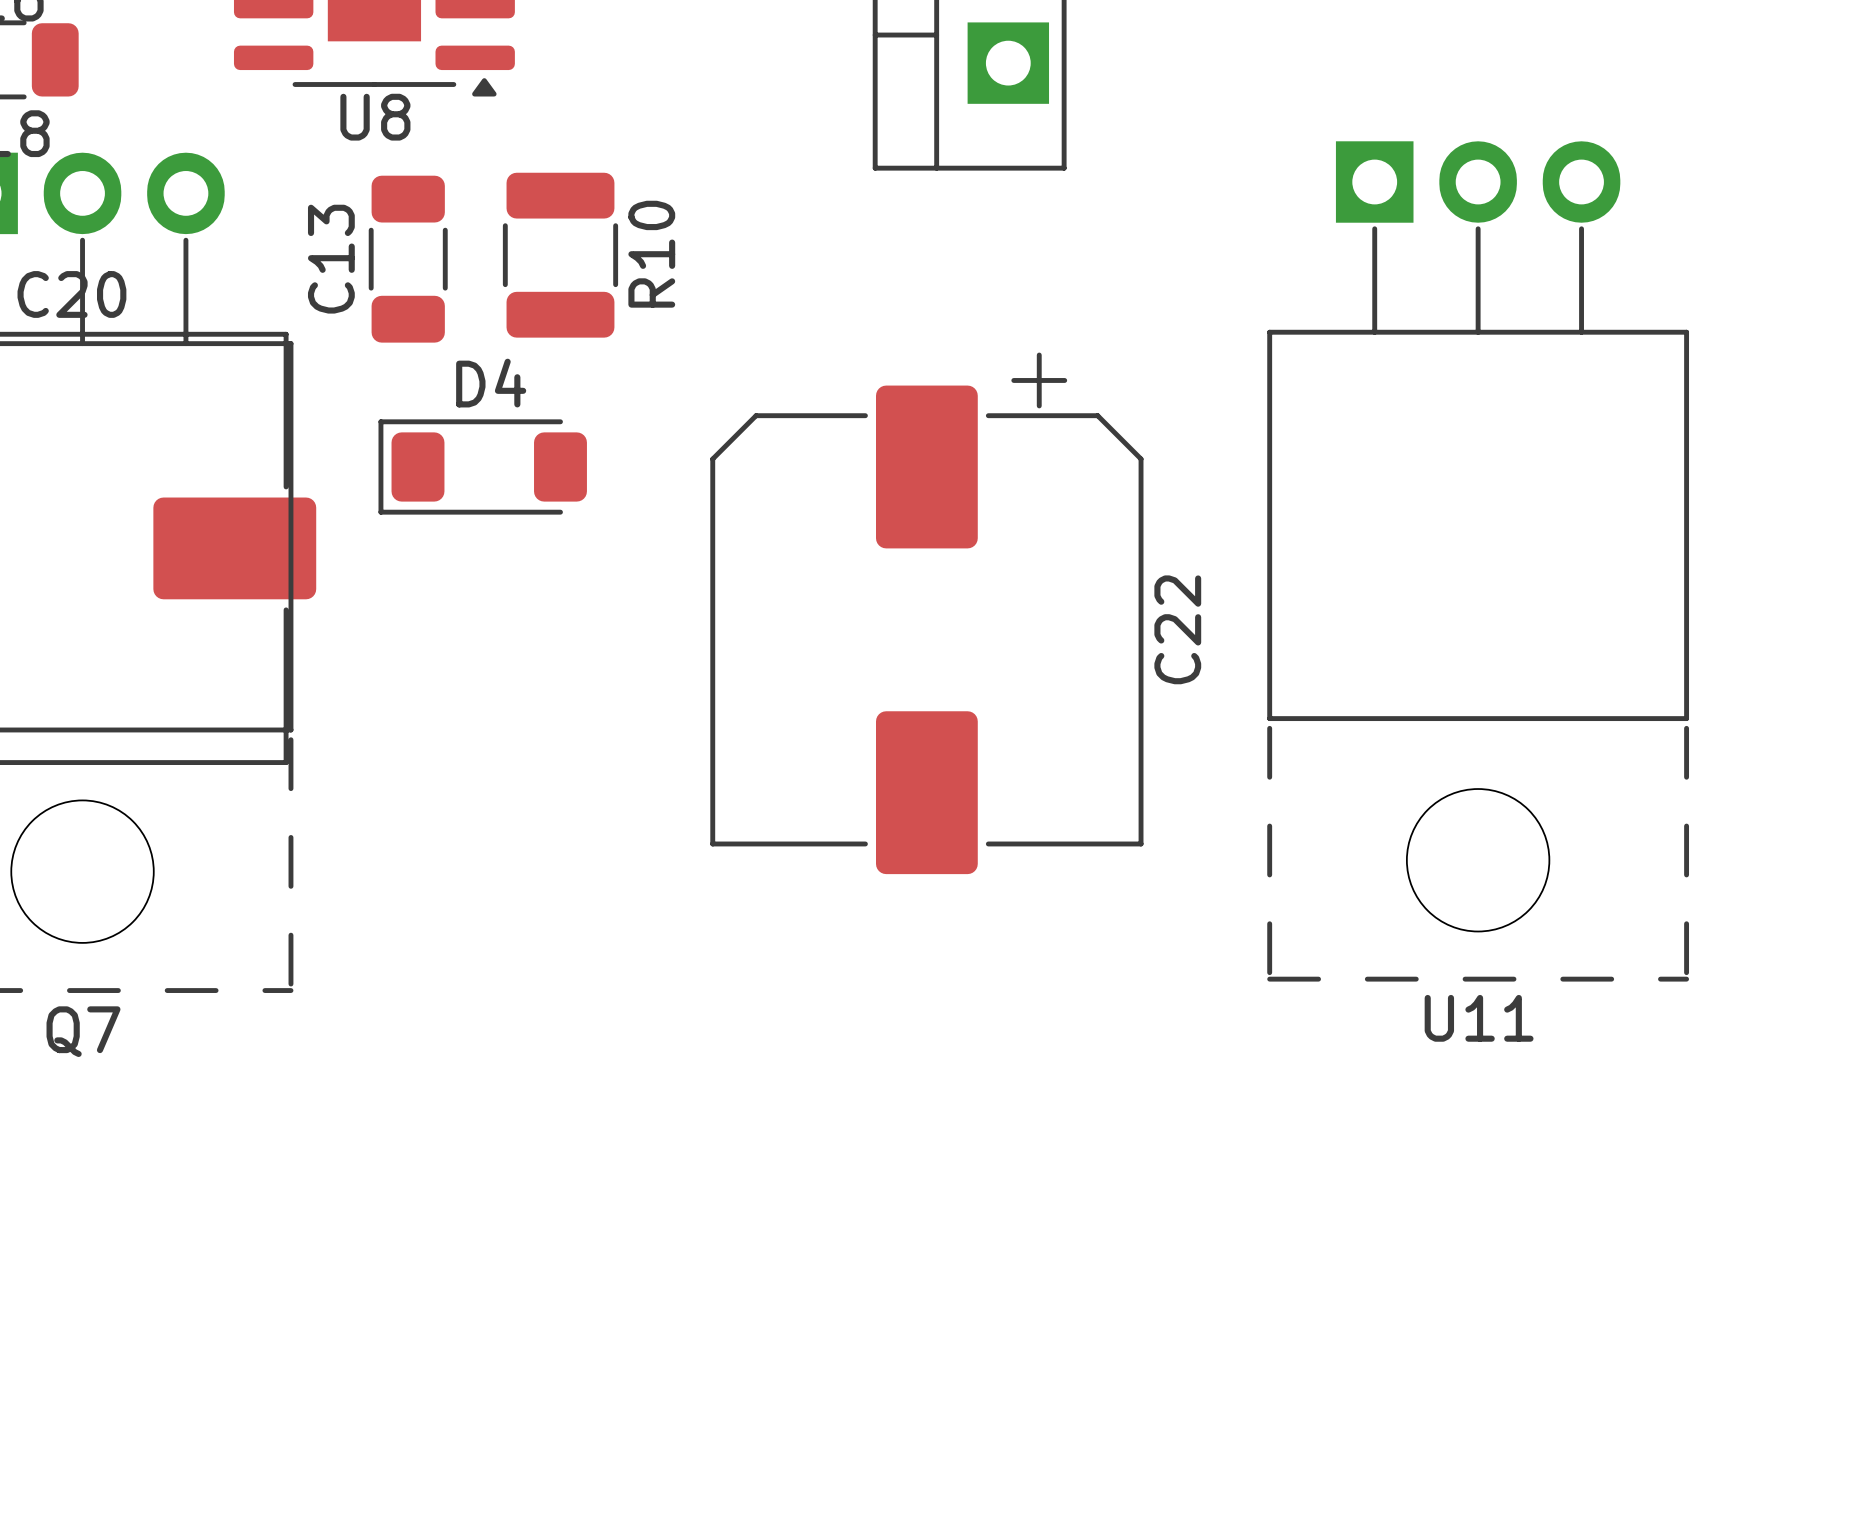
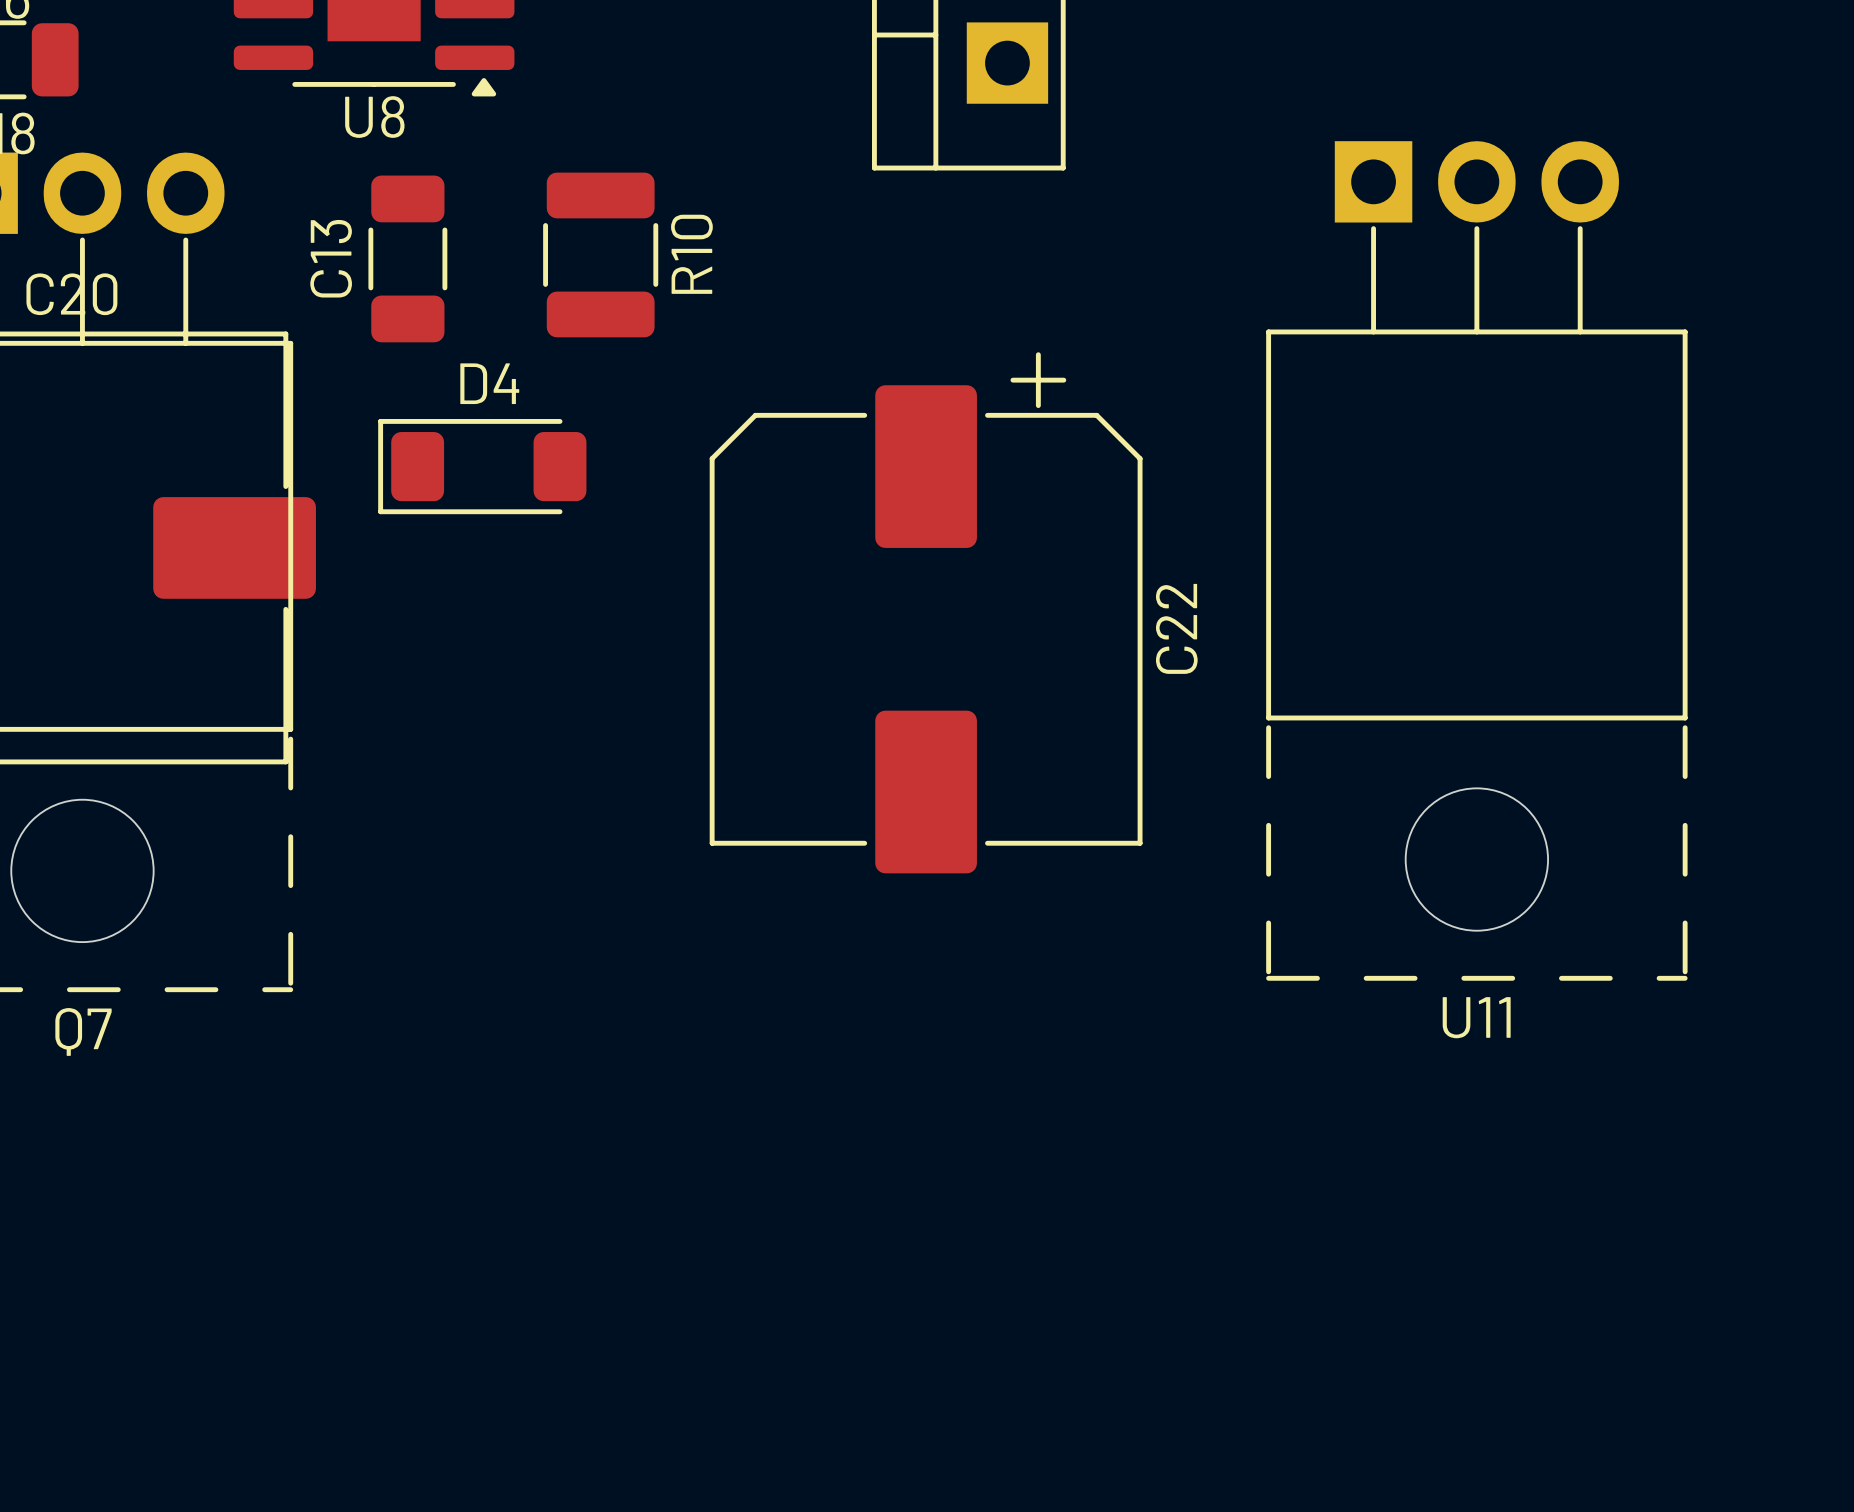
R10 position: (560, 255) -> (600, 254)

